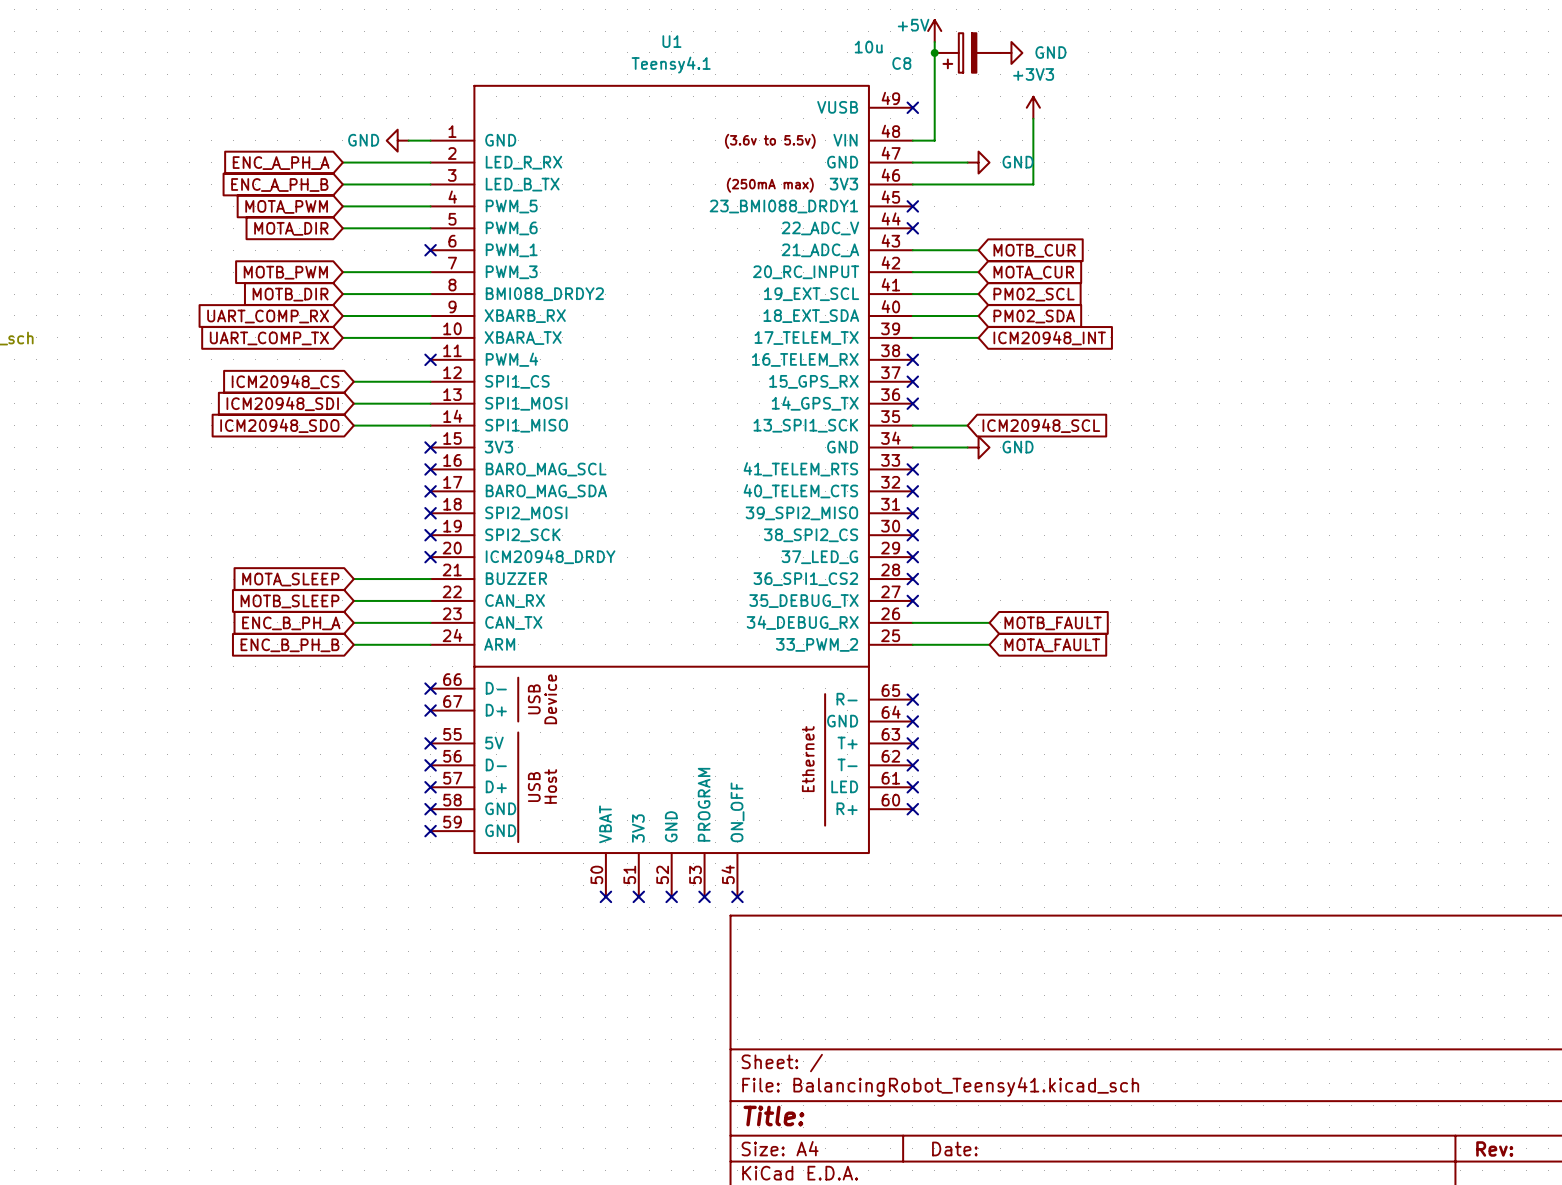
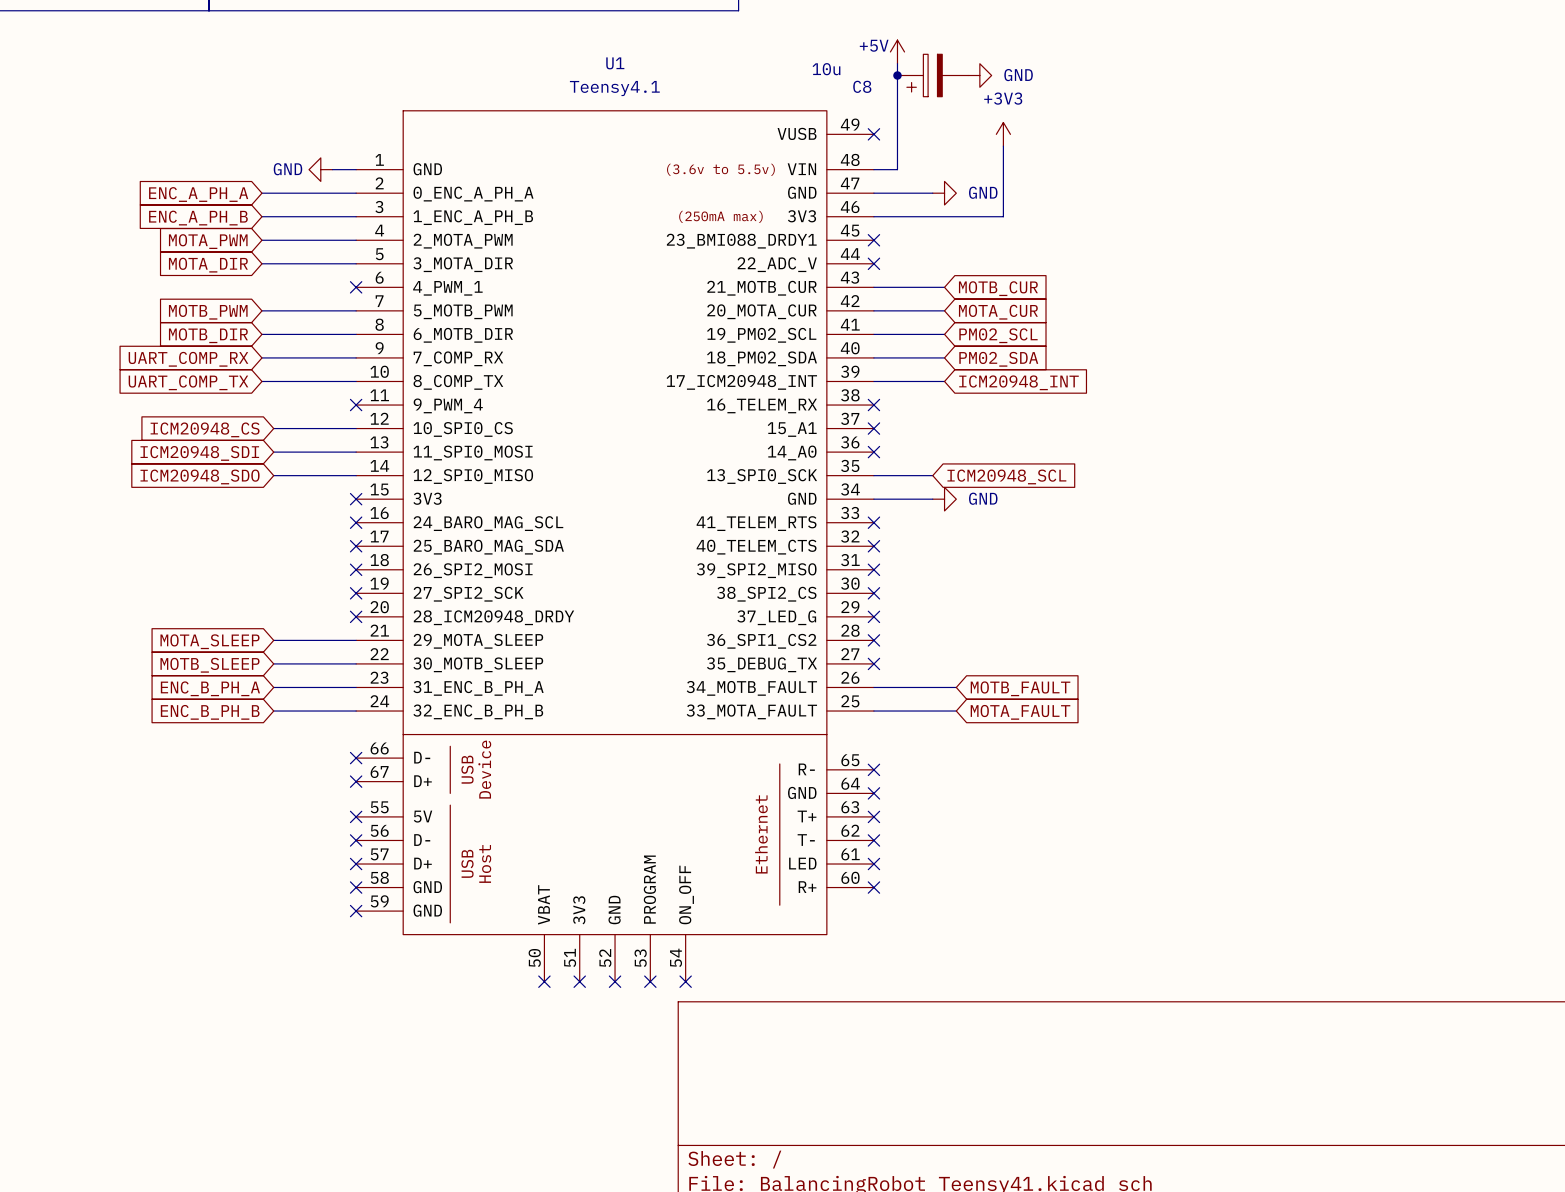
U1 symbol: [430, 85, 913, 897] -> [356, 110, 874, 982]

